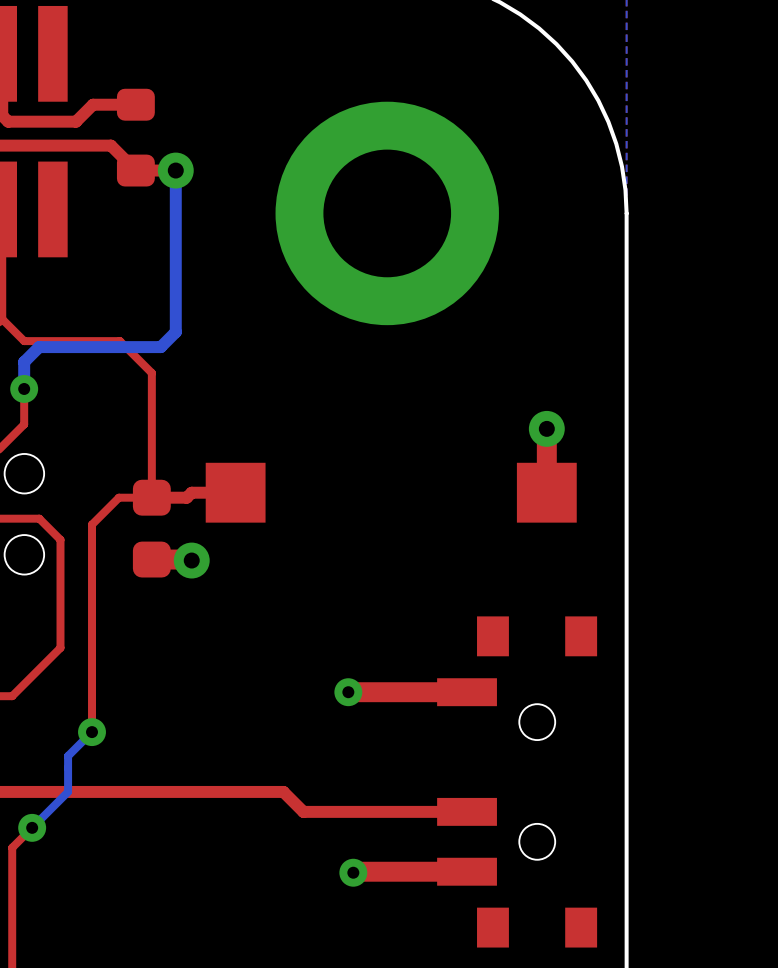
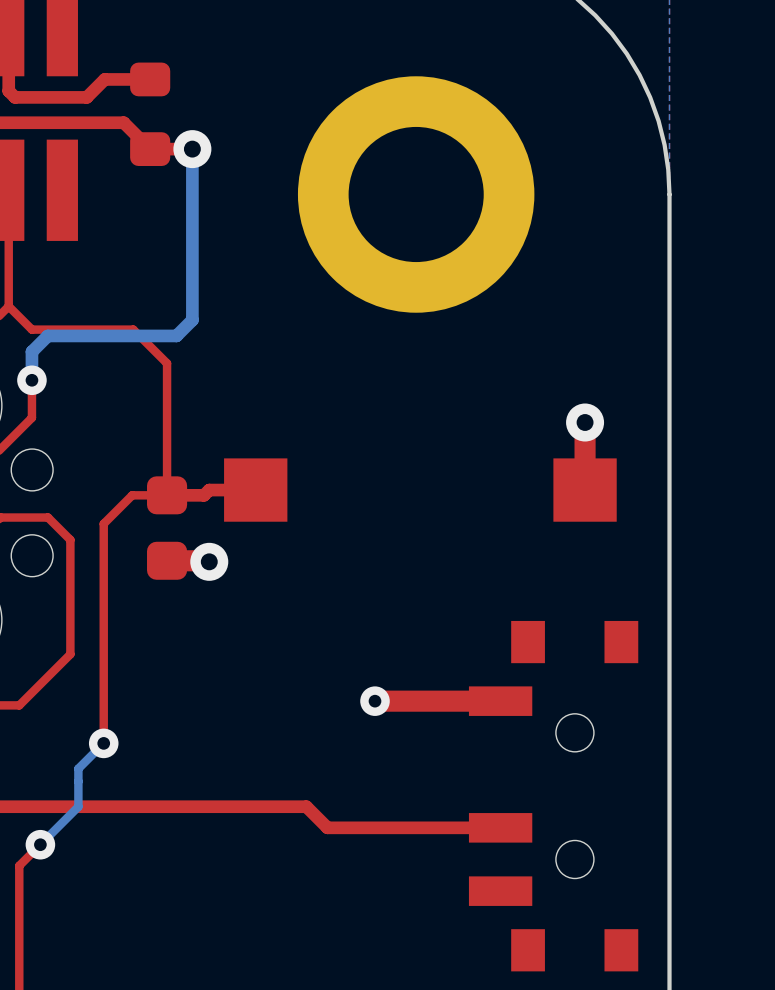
top track: (467, 871) (353, 872) -> none
via: (353, 872) -> none

